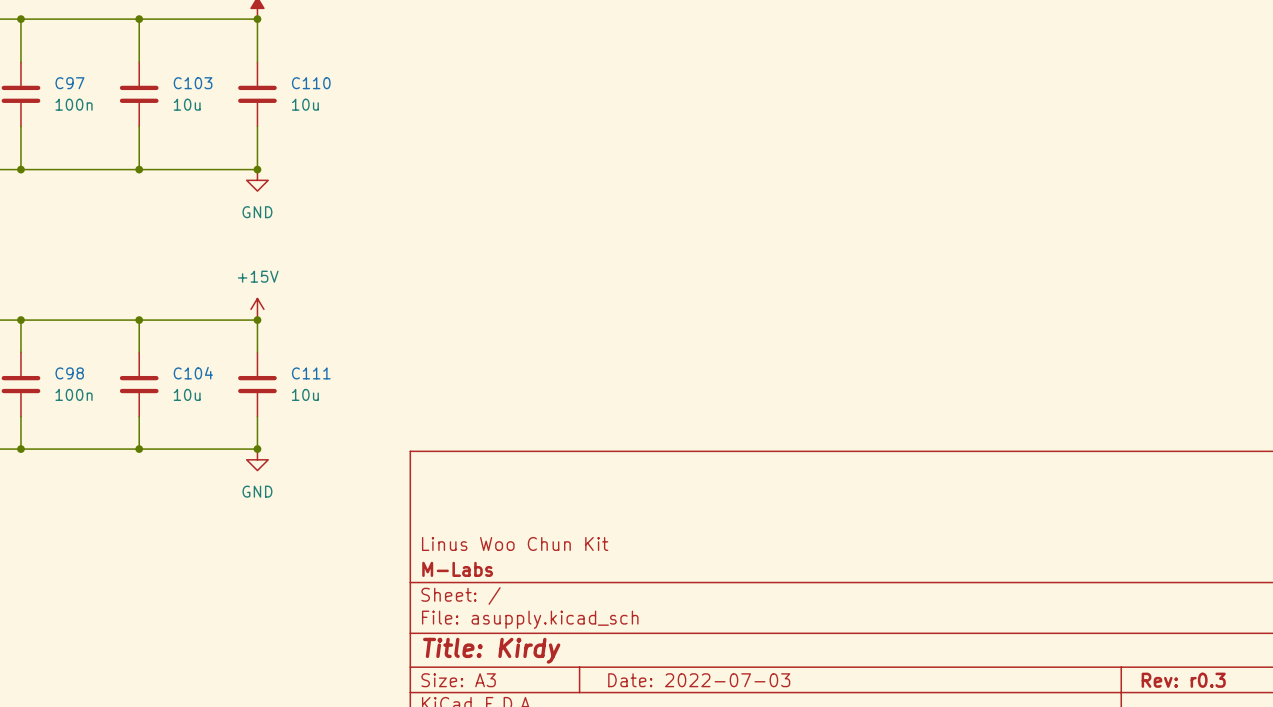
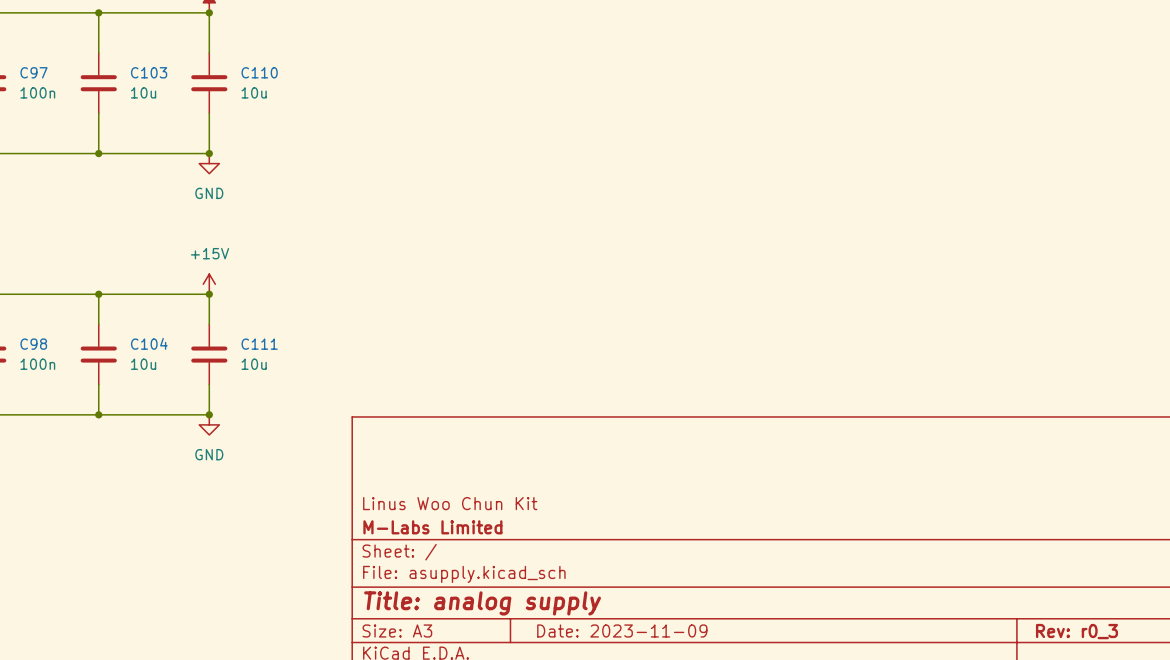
title block: M-Labs (457, 569) -> M-Labs Limited (432, 527)
title block: Title: Kirdy (491, 650) -> Title: analog supply (482, 603)
title block: Date: 2022-07-03 (699, 680) -> Date: 2023-11-09 (622, 630)
title block: Rev: r0.3 (1183, 680) -> Rev: r0_3 (1076, 631)

